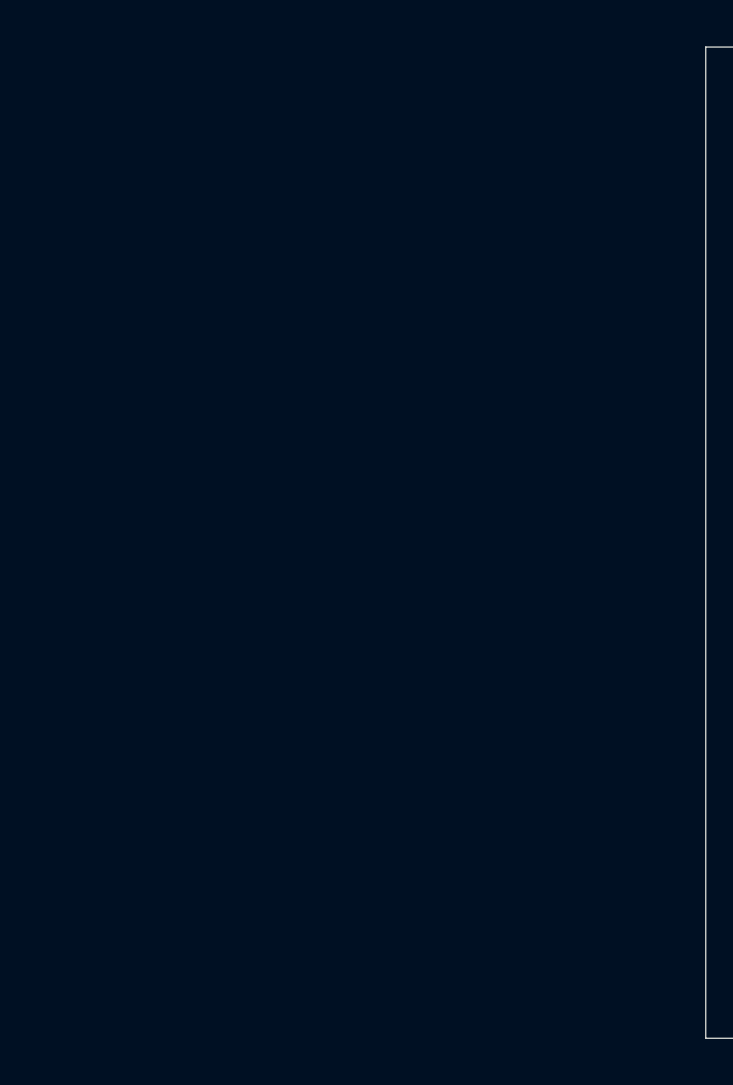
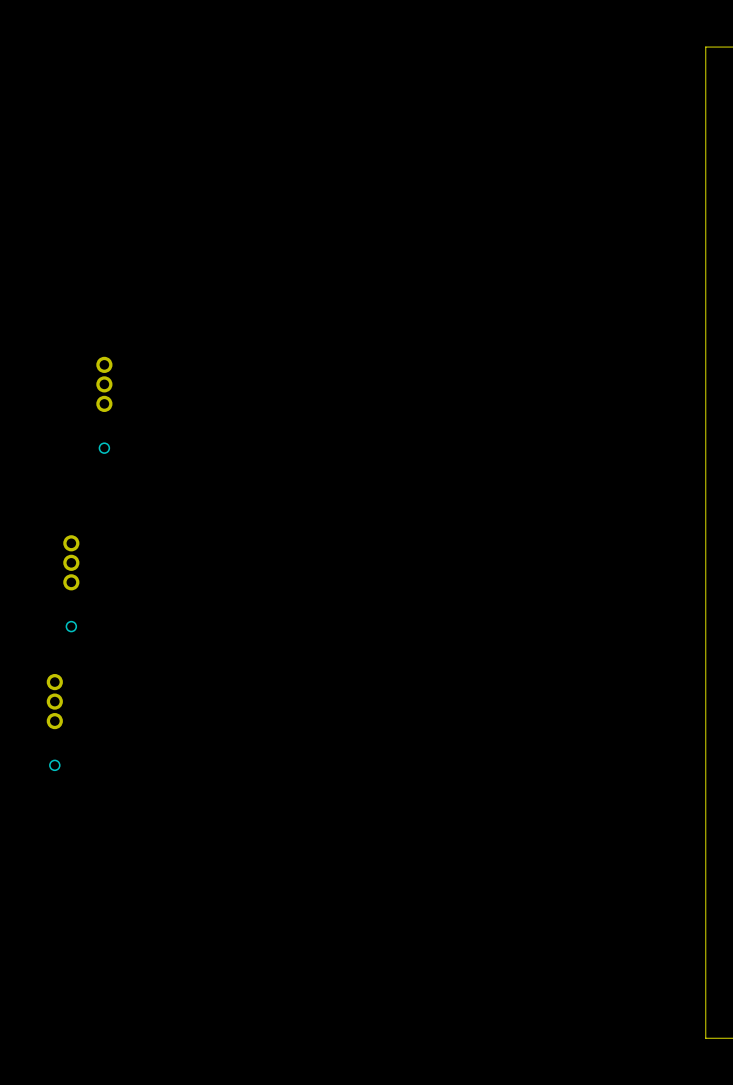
part: none -> (104, 405)
part: none -> (71, 583)
part: none -> (54, 722)

